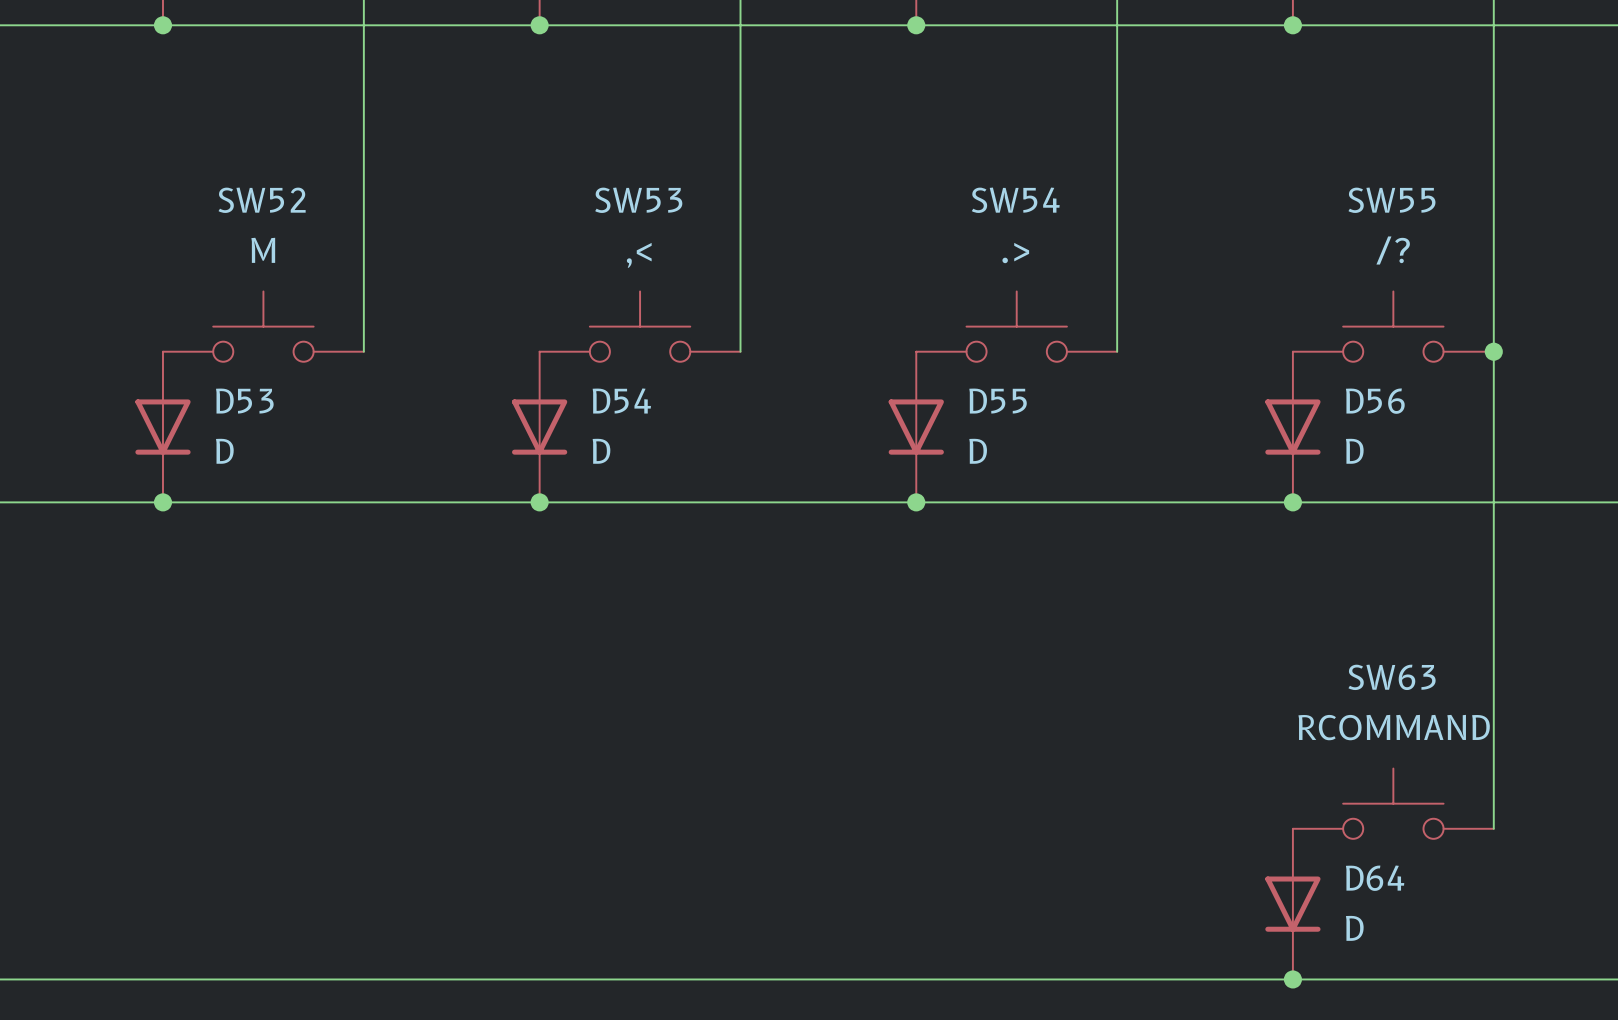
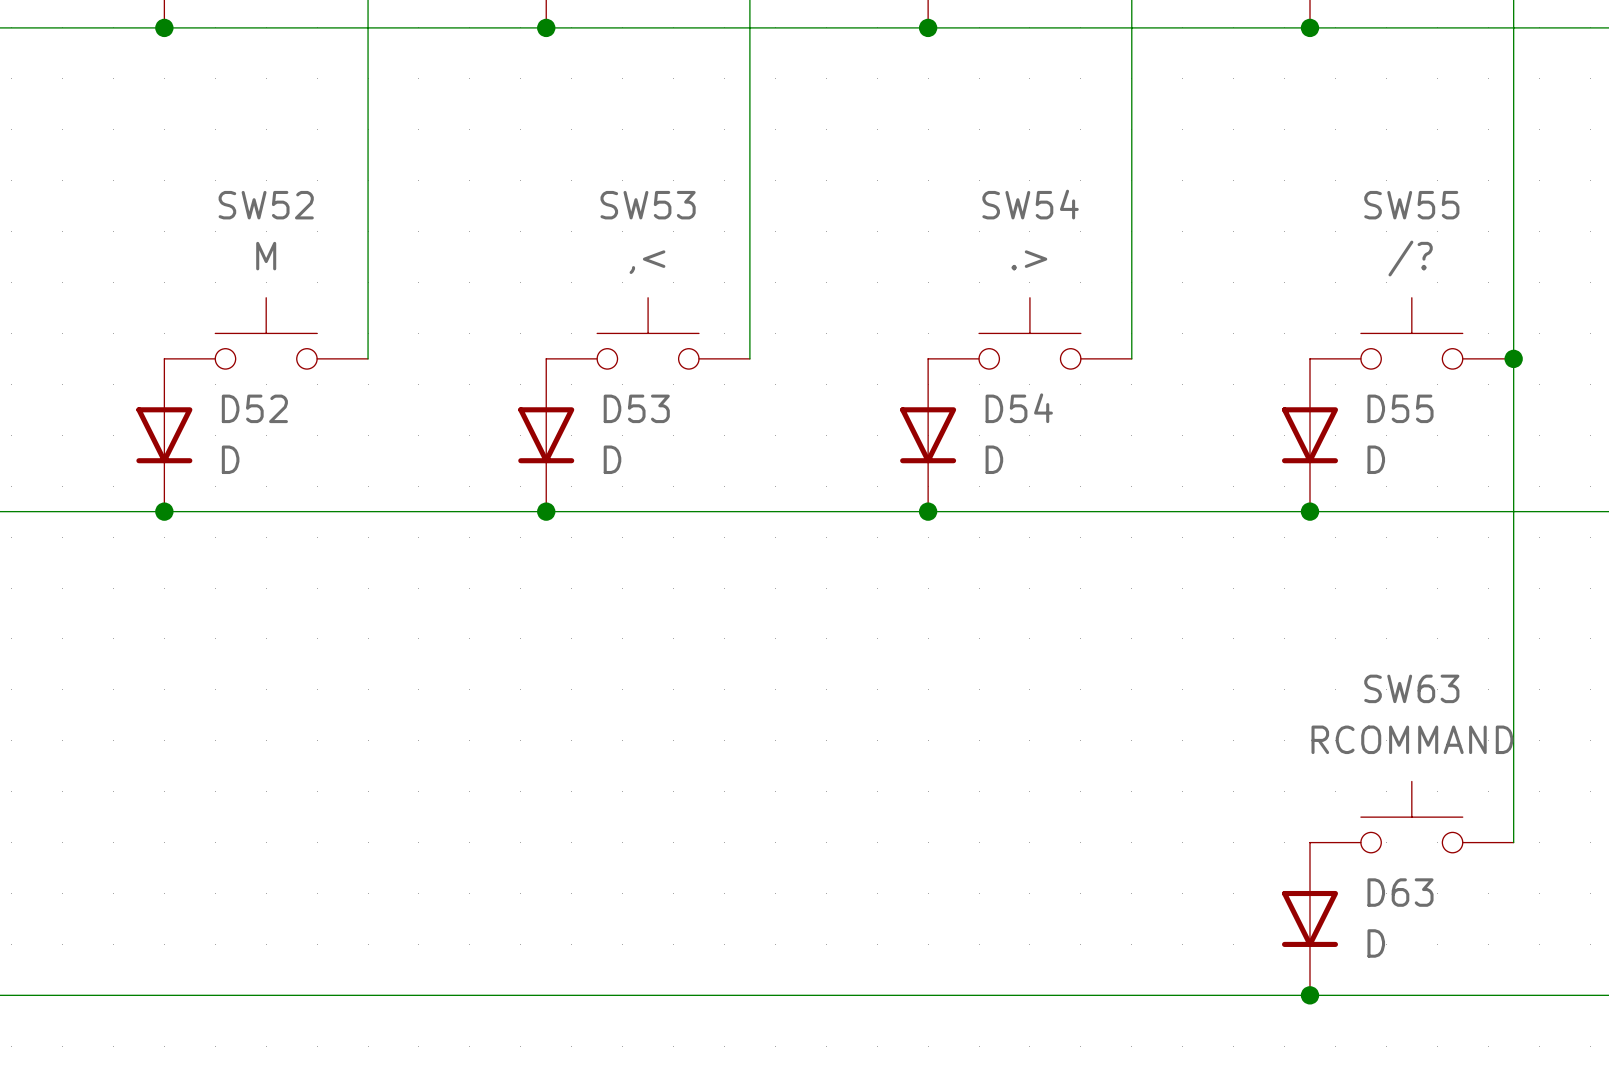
D54 name: D54 (621, 400) -> D53 (636, 408)
D53 name: D53 (244, 401) -> D52 (254, 408)
D55 name: D55 (998, 401) -> D54 (1019, 408)
D56 name: D56 (1375, 401) -> D55 (1400, 408)
D64 name: D64 (1375, 878) -> D63 (1400, 892)

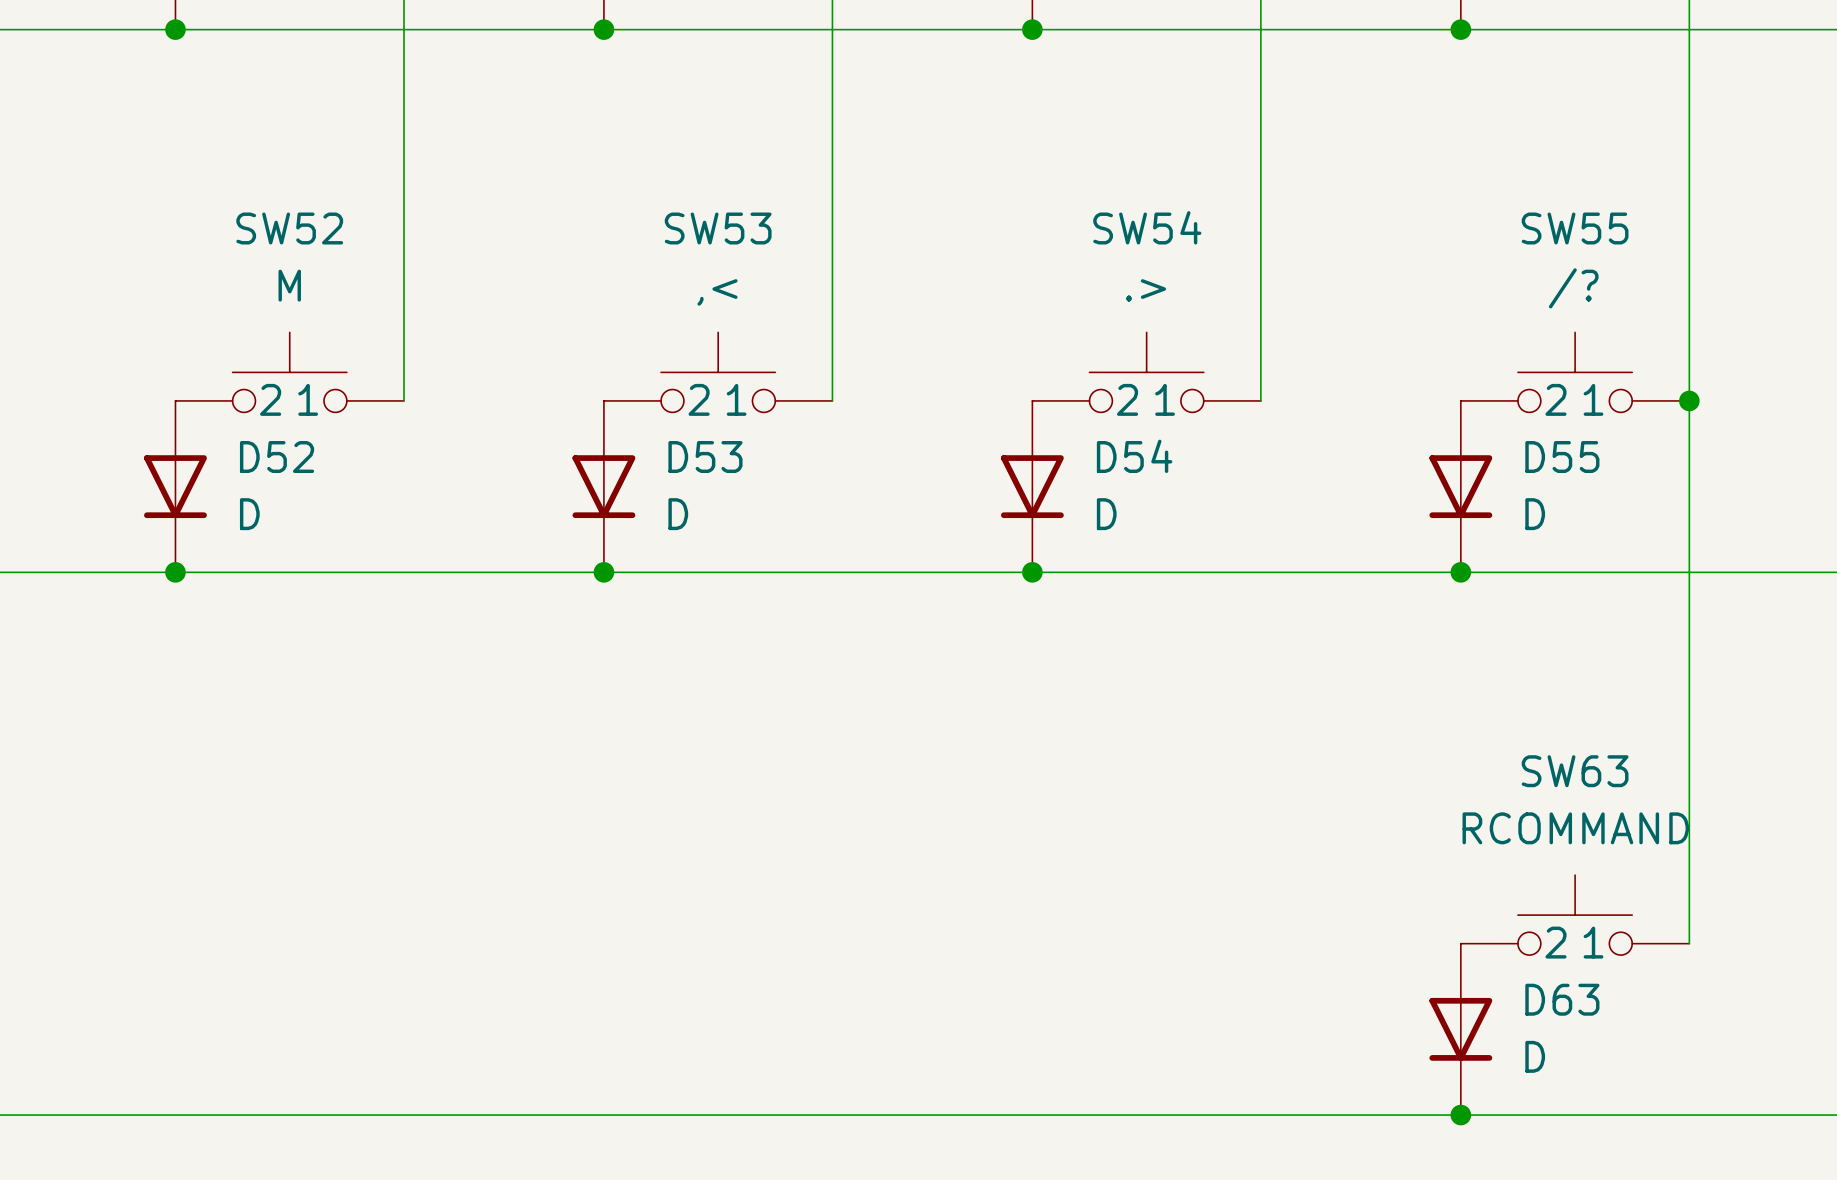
SW52 pin name: none -> 2 (270, 399)
SW52 pin name: none -> 1 (308, 399)
SW53 pin name: none -> 2 (699, 399)
SW53 pin name: none -> 1 (736, 399)
SW54 pin name: none -> 2 (1127, 399)
SW54 pin name: none -> 1 (1165, 399)
SW55 pin name: none -> 2 (1555, 399)
SW55 pin name: none -> 1 (1593, 399)
SW63 pin name: none -> 2 (1555, 942)
SW63 pin name: none -> 1 (1593, 942)

